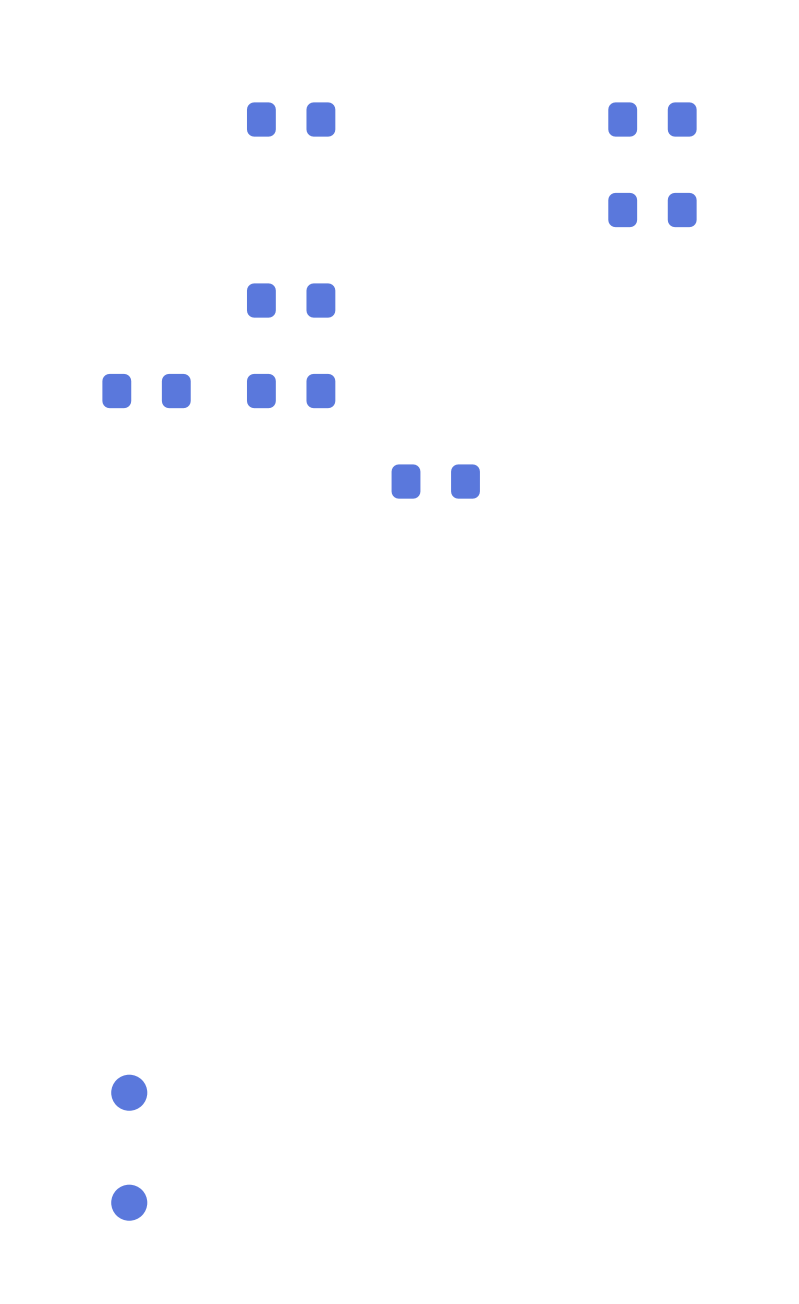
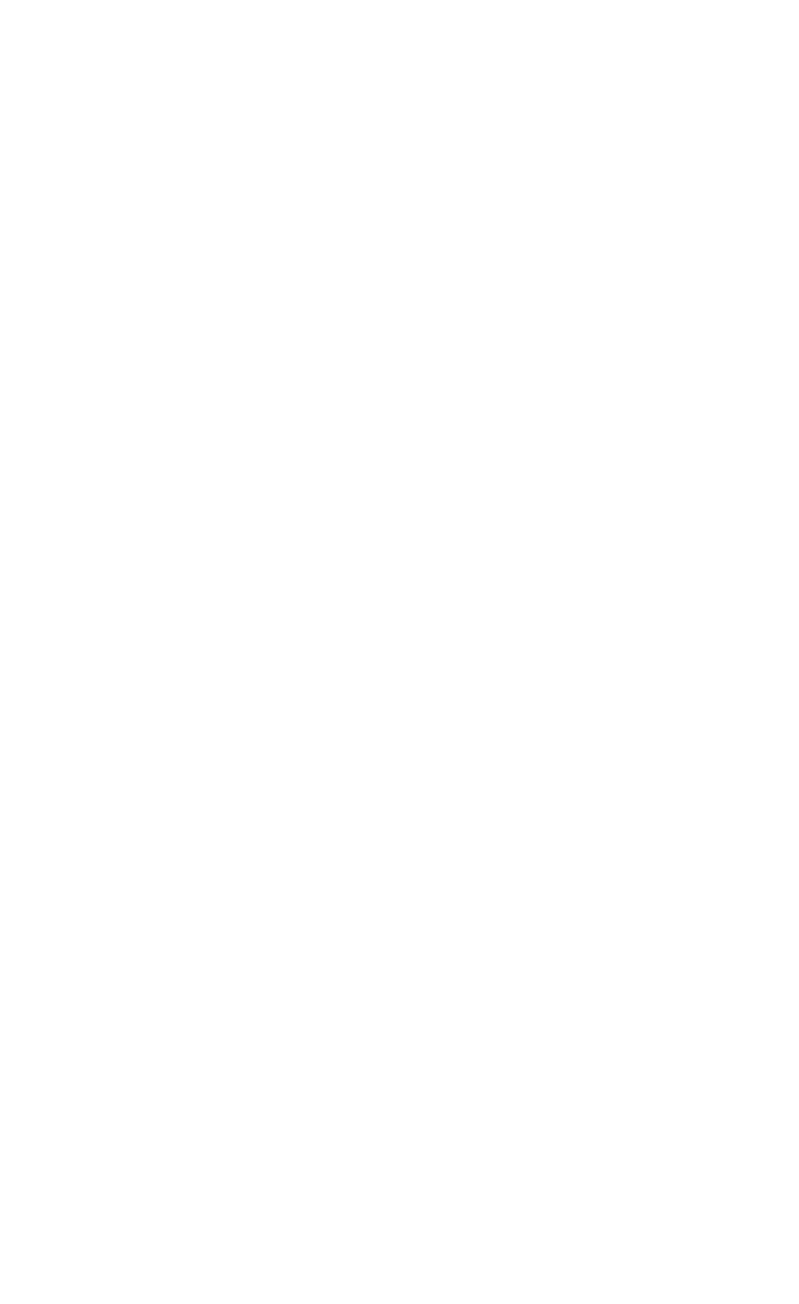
part: (291, 119) -> none
part: (652, 119) -> none
part: (652, 210) -> none
part: (291, 300) -> none
part: (146, 391) -> none
part: (291, 391) -> none
part: (435, 481) -> none
part: (129, 1092) -> none
part: (129, 1202) -> none

